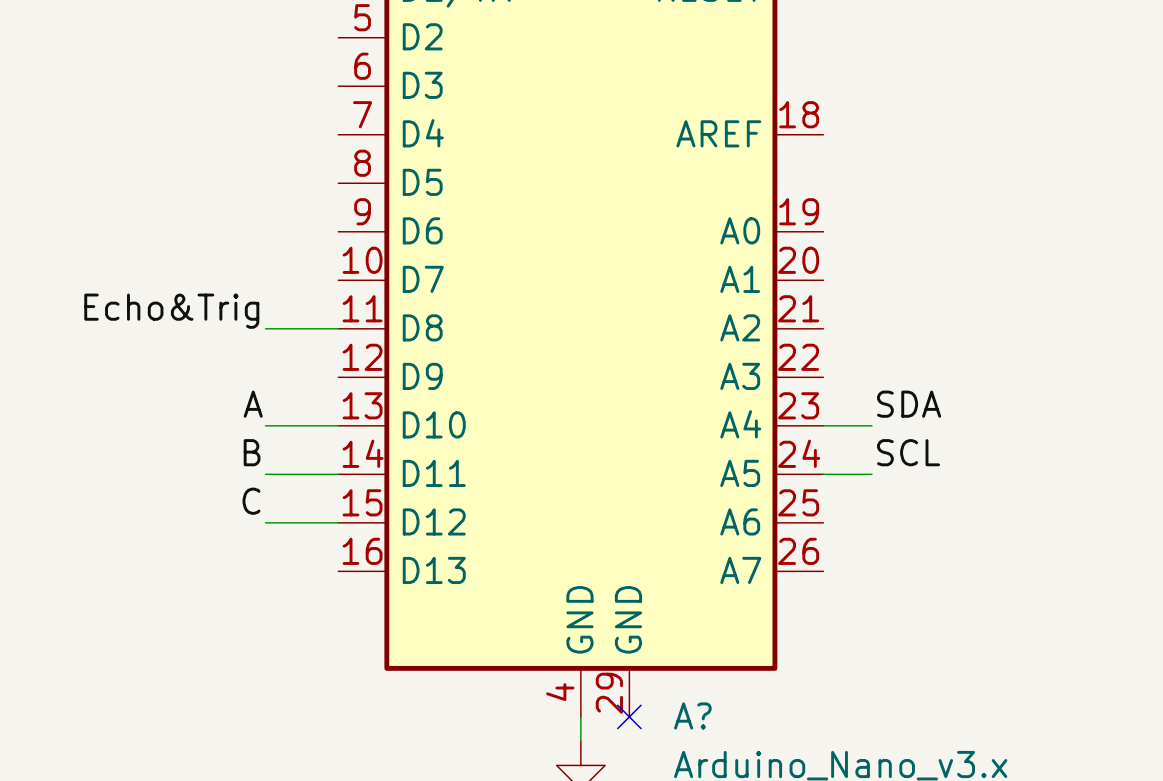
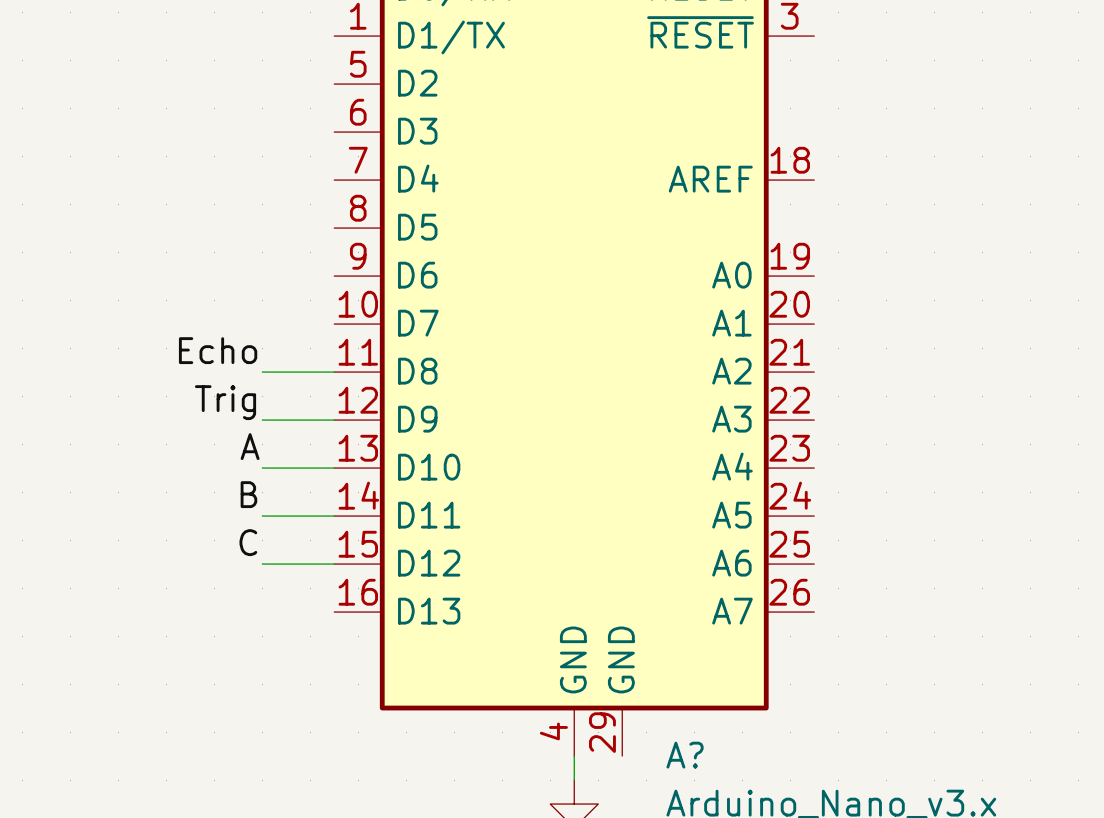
label: Echo&Trig (171, 311) -> Echo (218, 350)
label: none -> Trig (225, 402)
wire: none -> (262, 420) (334, 420)
label: SDA (909, 404) -> none
wire: (823, 425) (871, 425) -> none
label: SCL (908, 452) -> none
wire: (823, 474) (871, 474) -> none
no-connect mark: (629, 716) -> none

